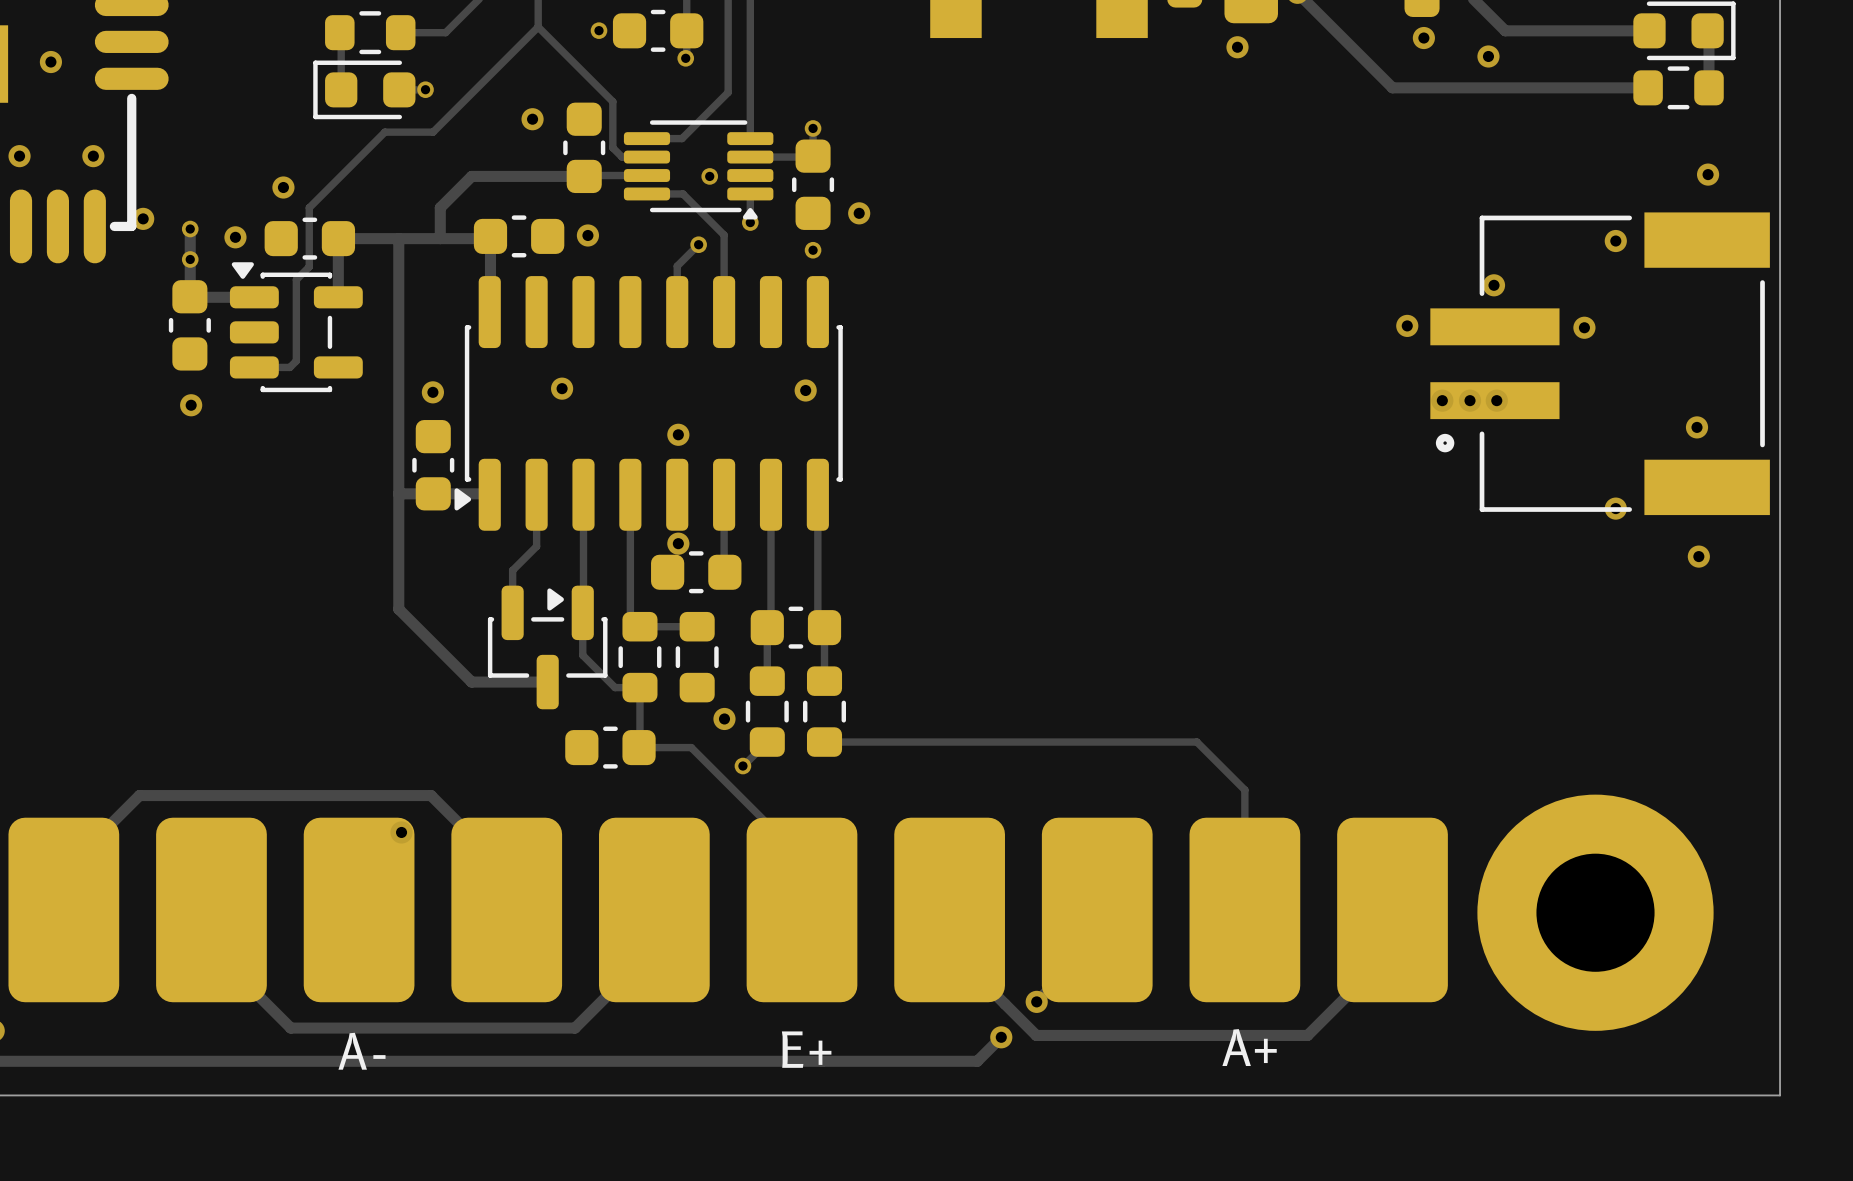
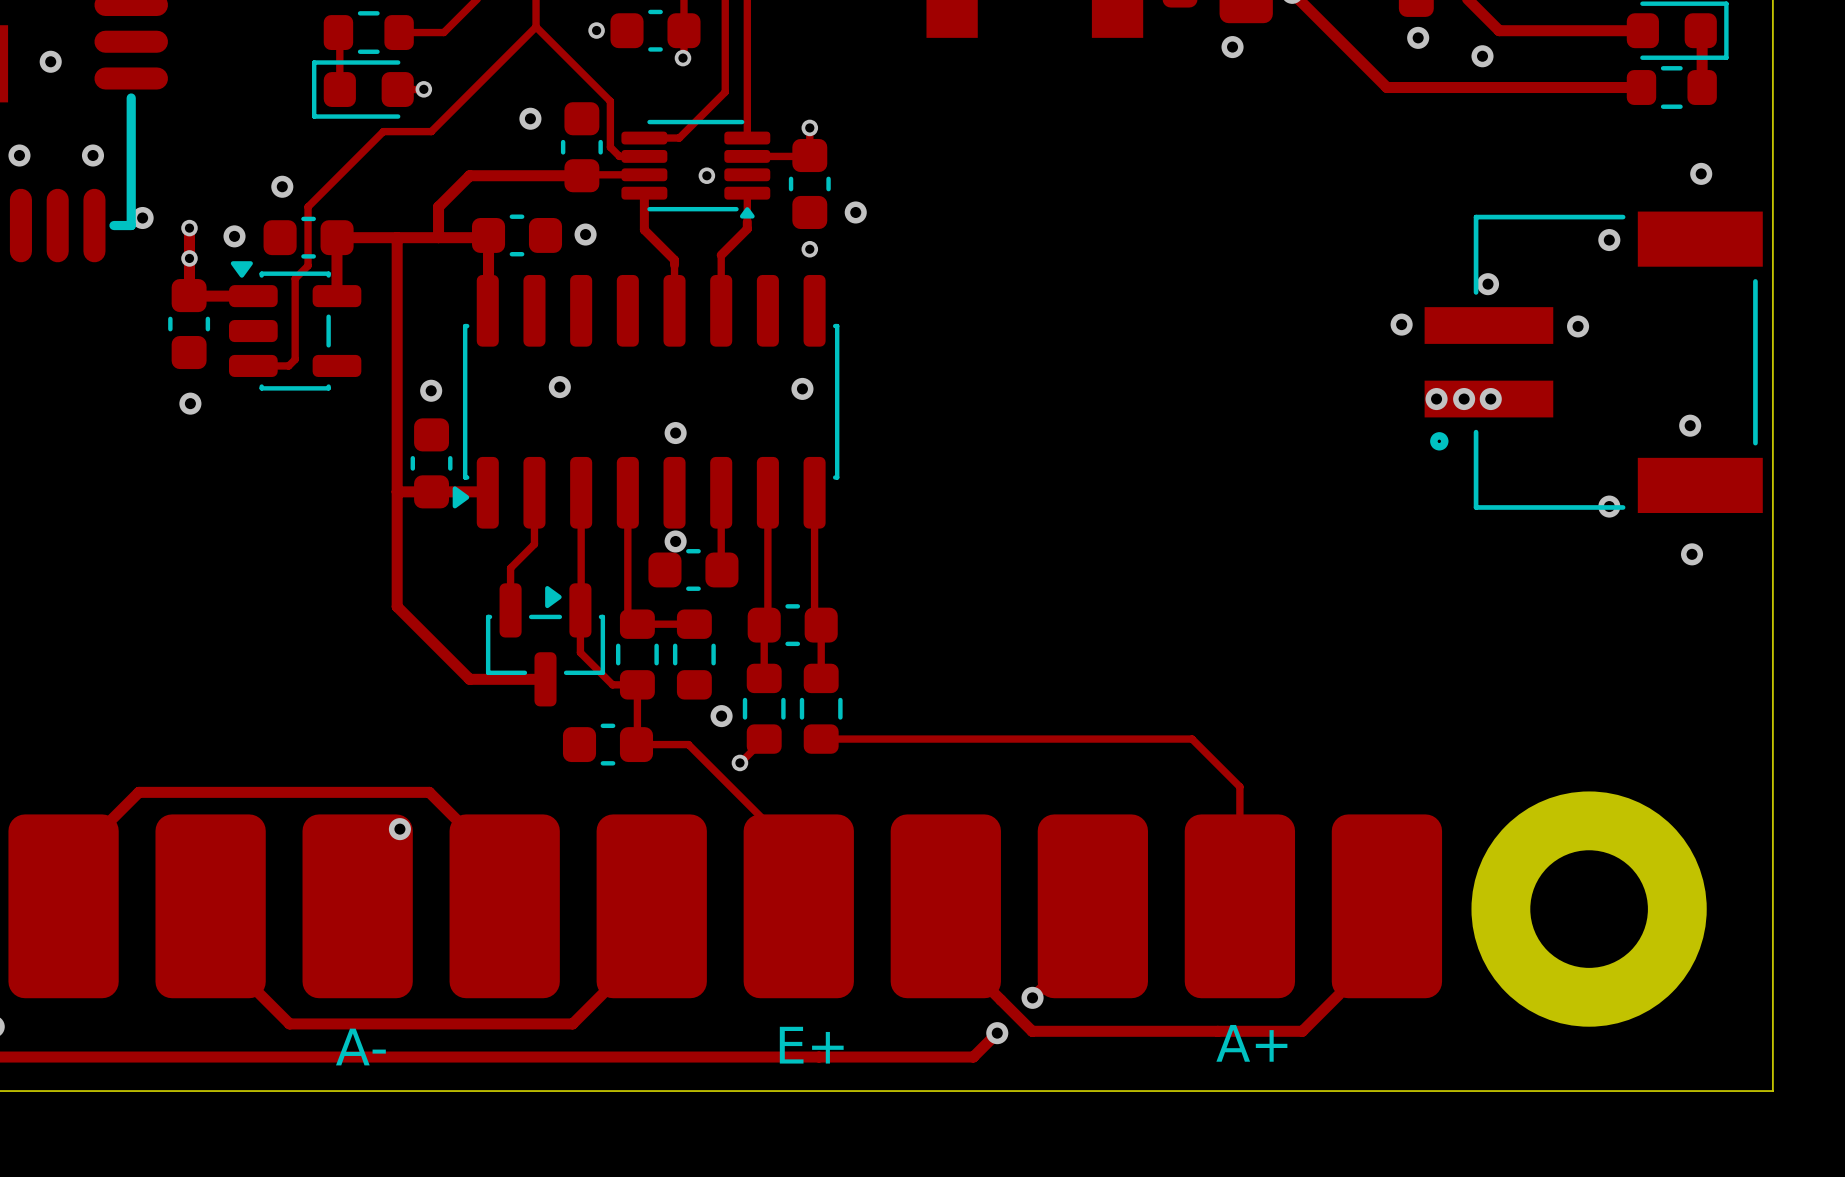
track: (646, 193) (682, 193) (724, 235) (724, 256) -> (644, 193) (644, 229) (674, 260) (674, 265)
track: none -> (747, 221) (747, 229) (721, 255)
via: (750, 222) -> none
track: (698, 244) (677, 266) -> none
via: (698, 244) -> none

